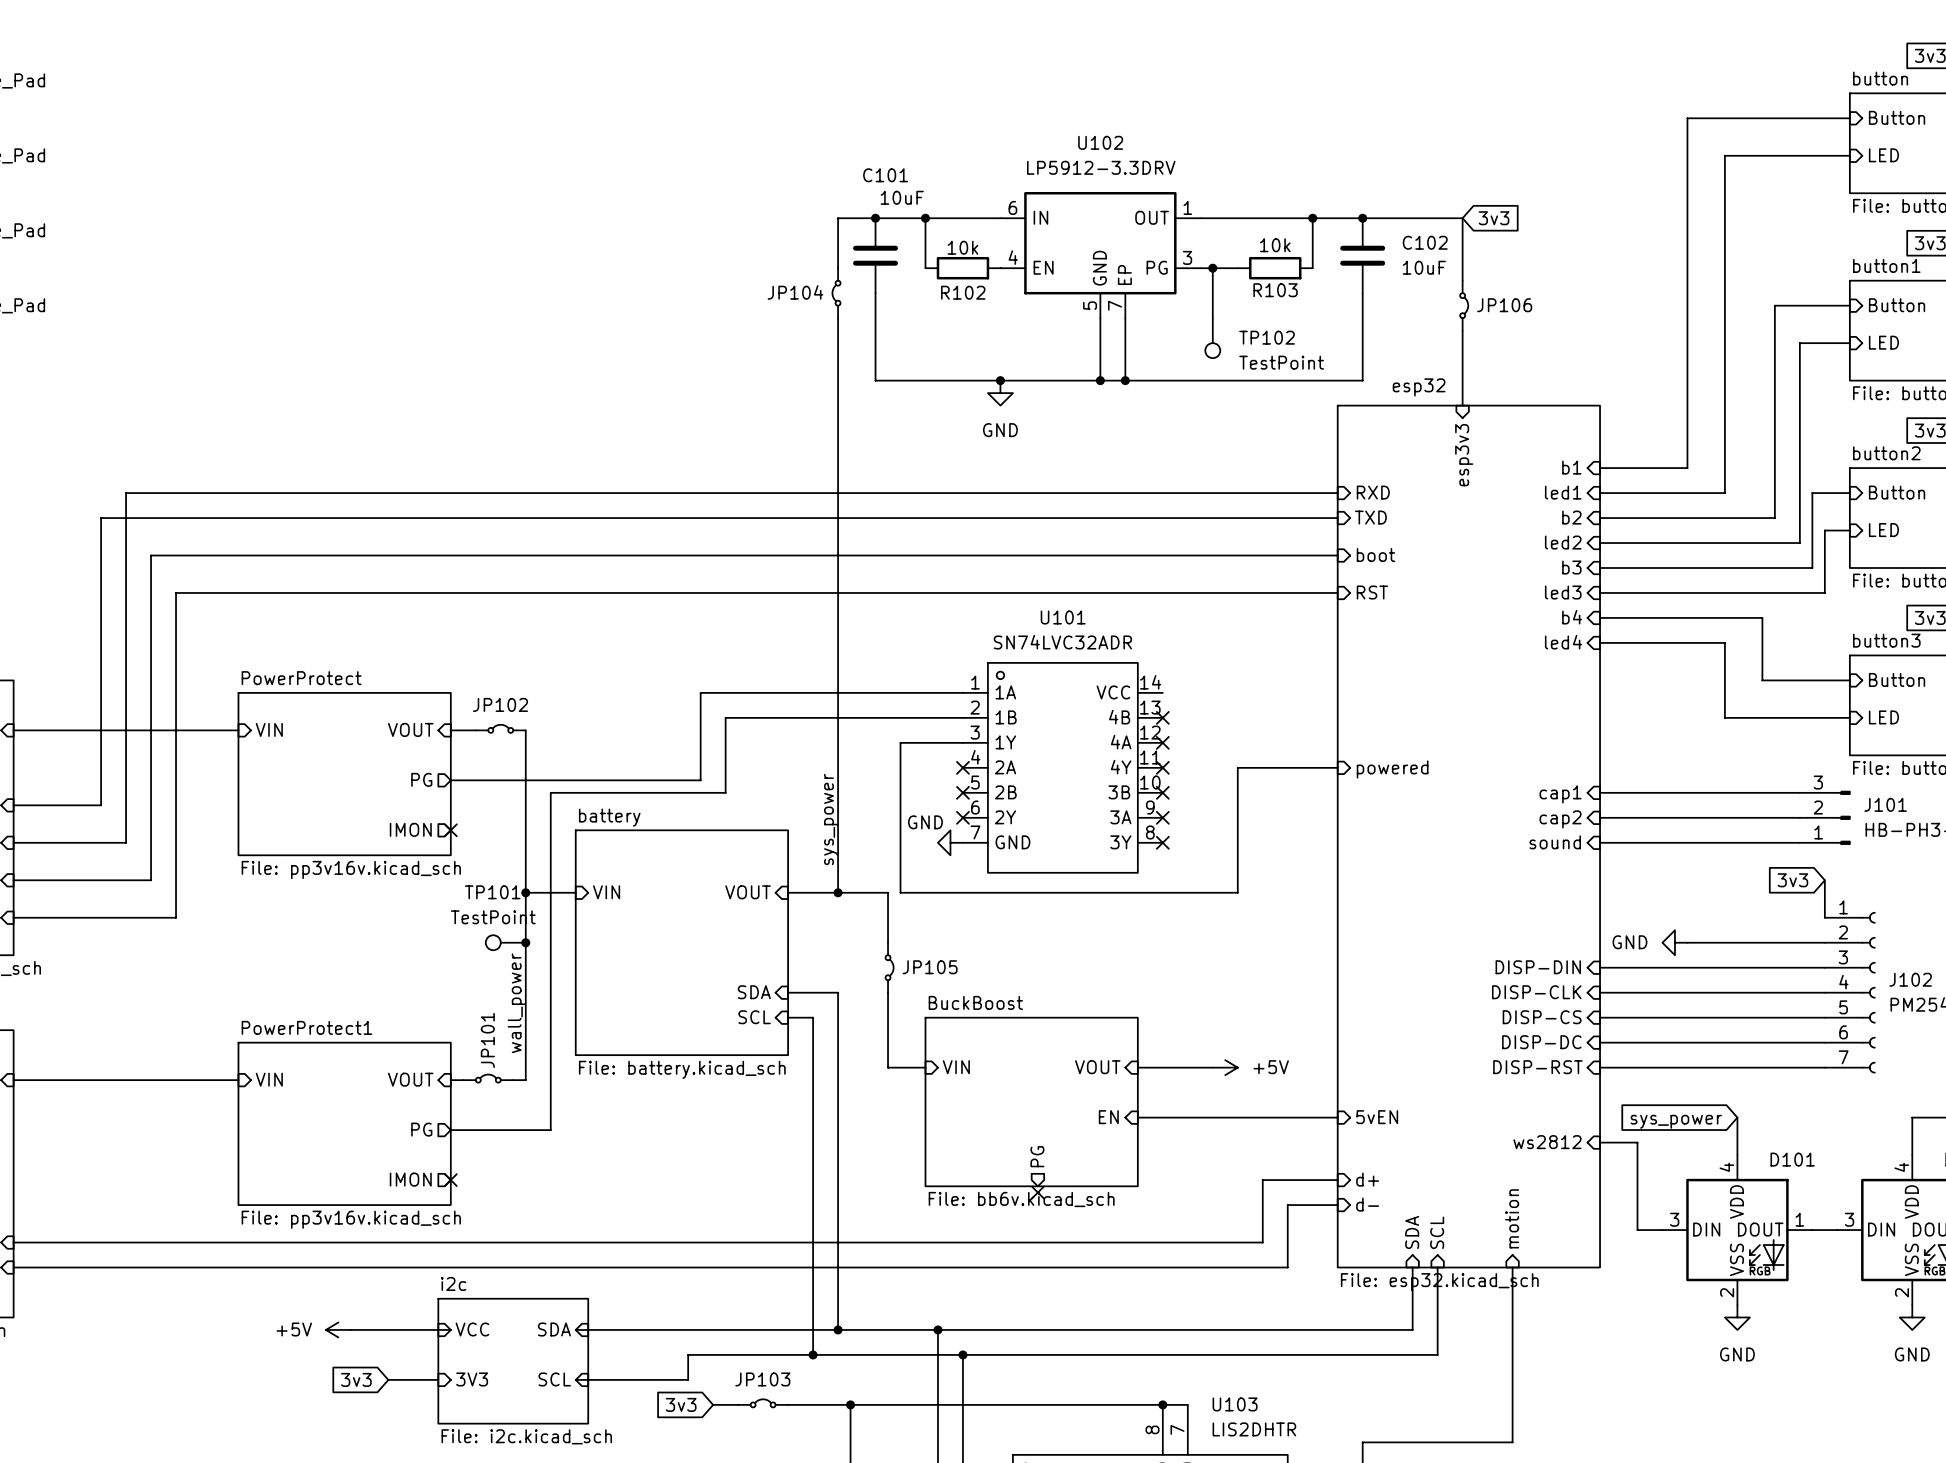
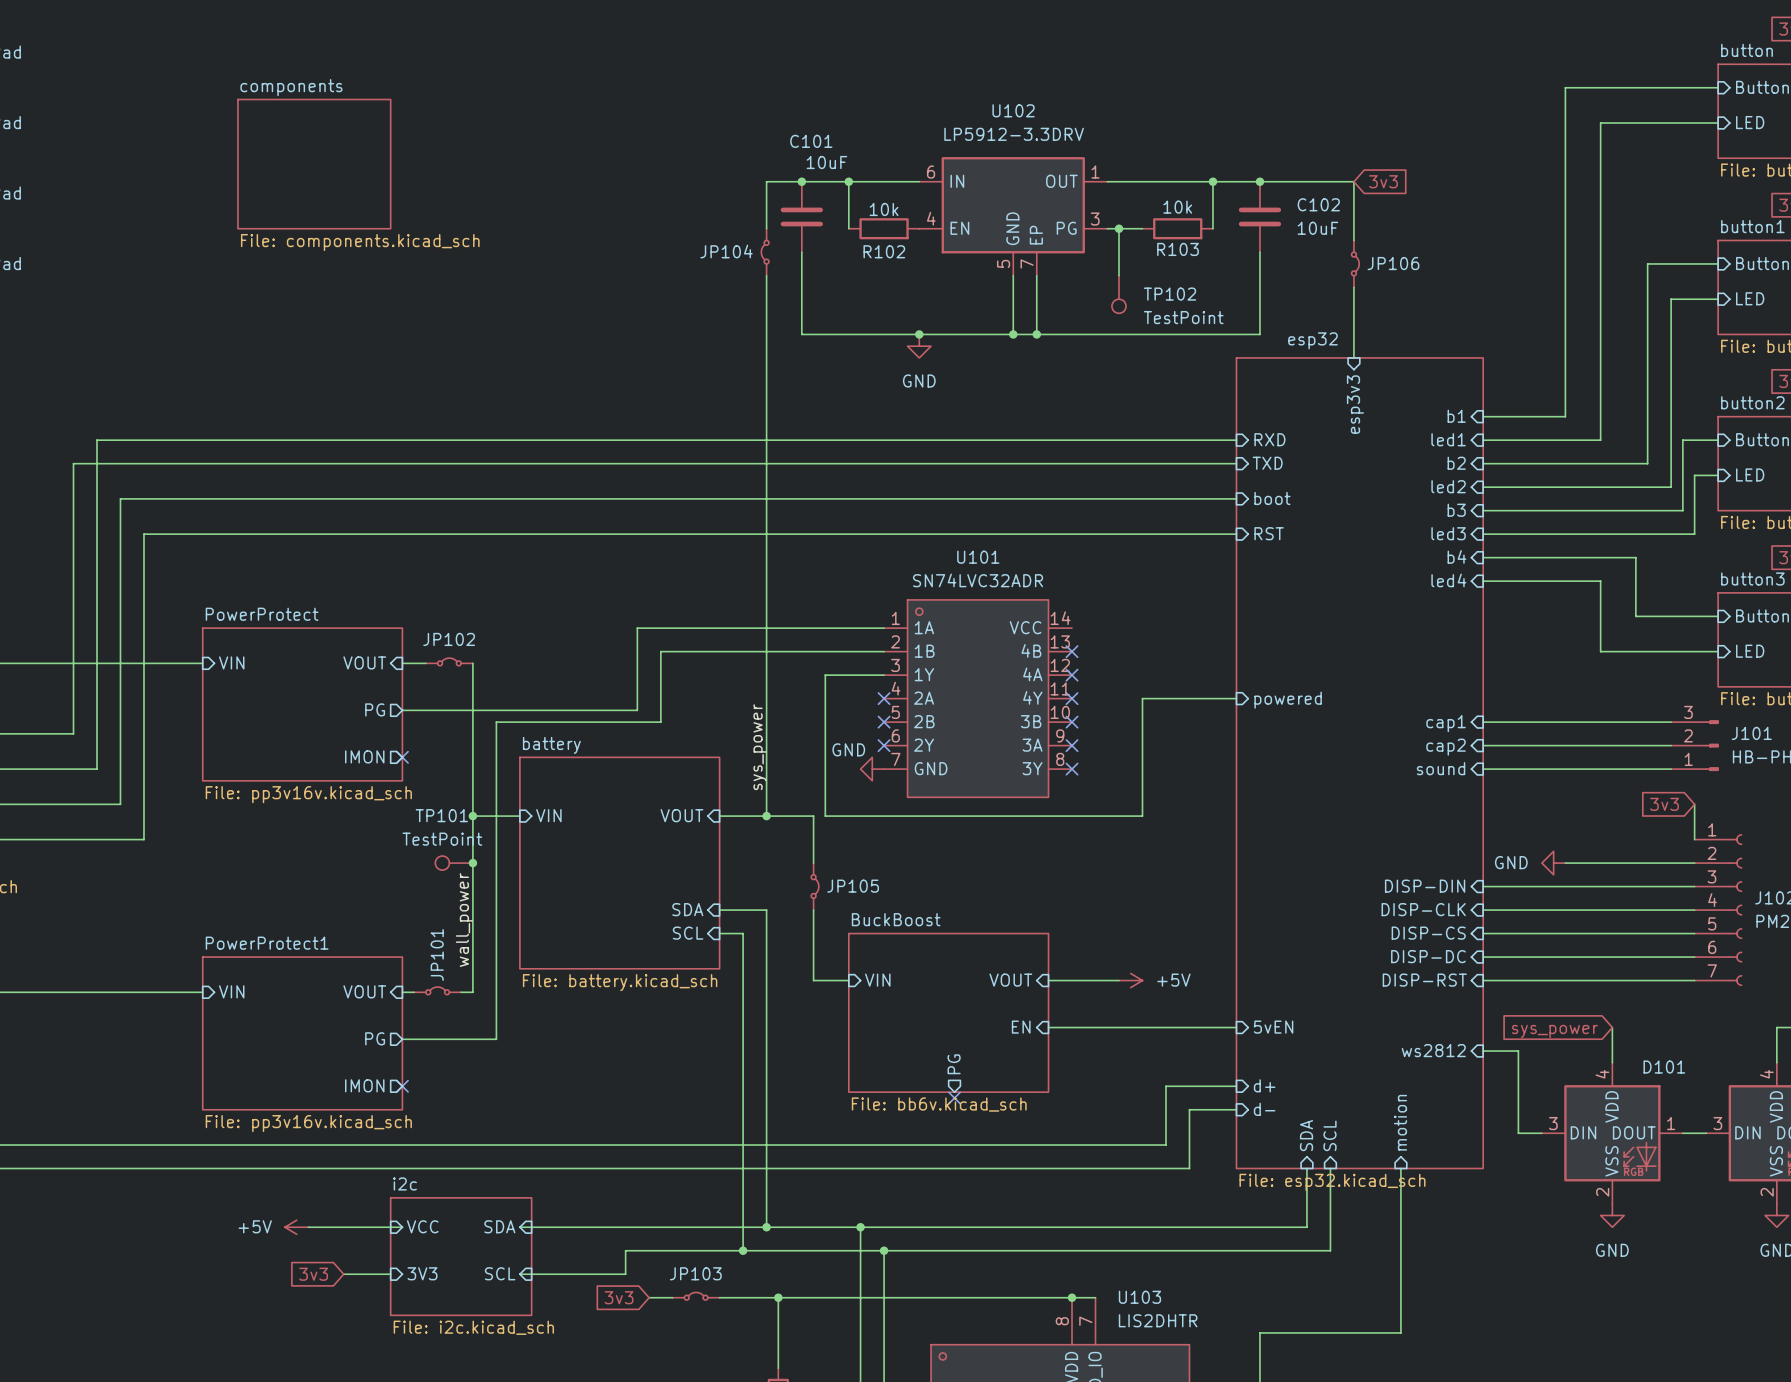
sheet components: none -> File: components.kicad_sch (314, 164)

